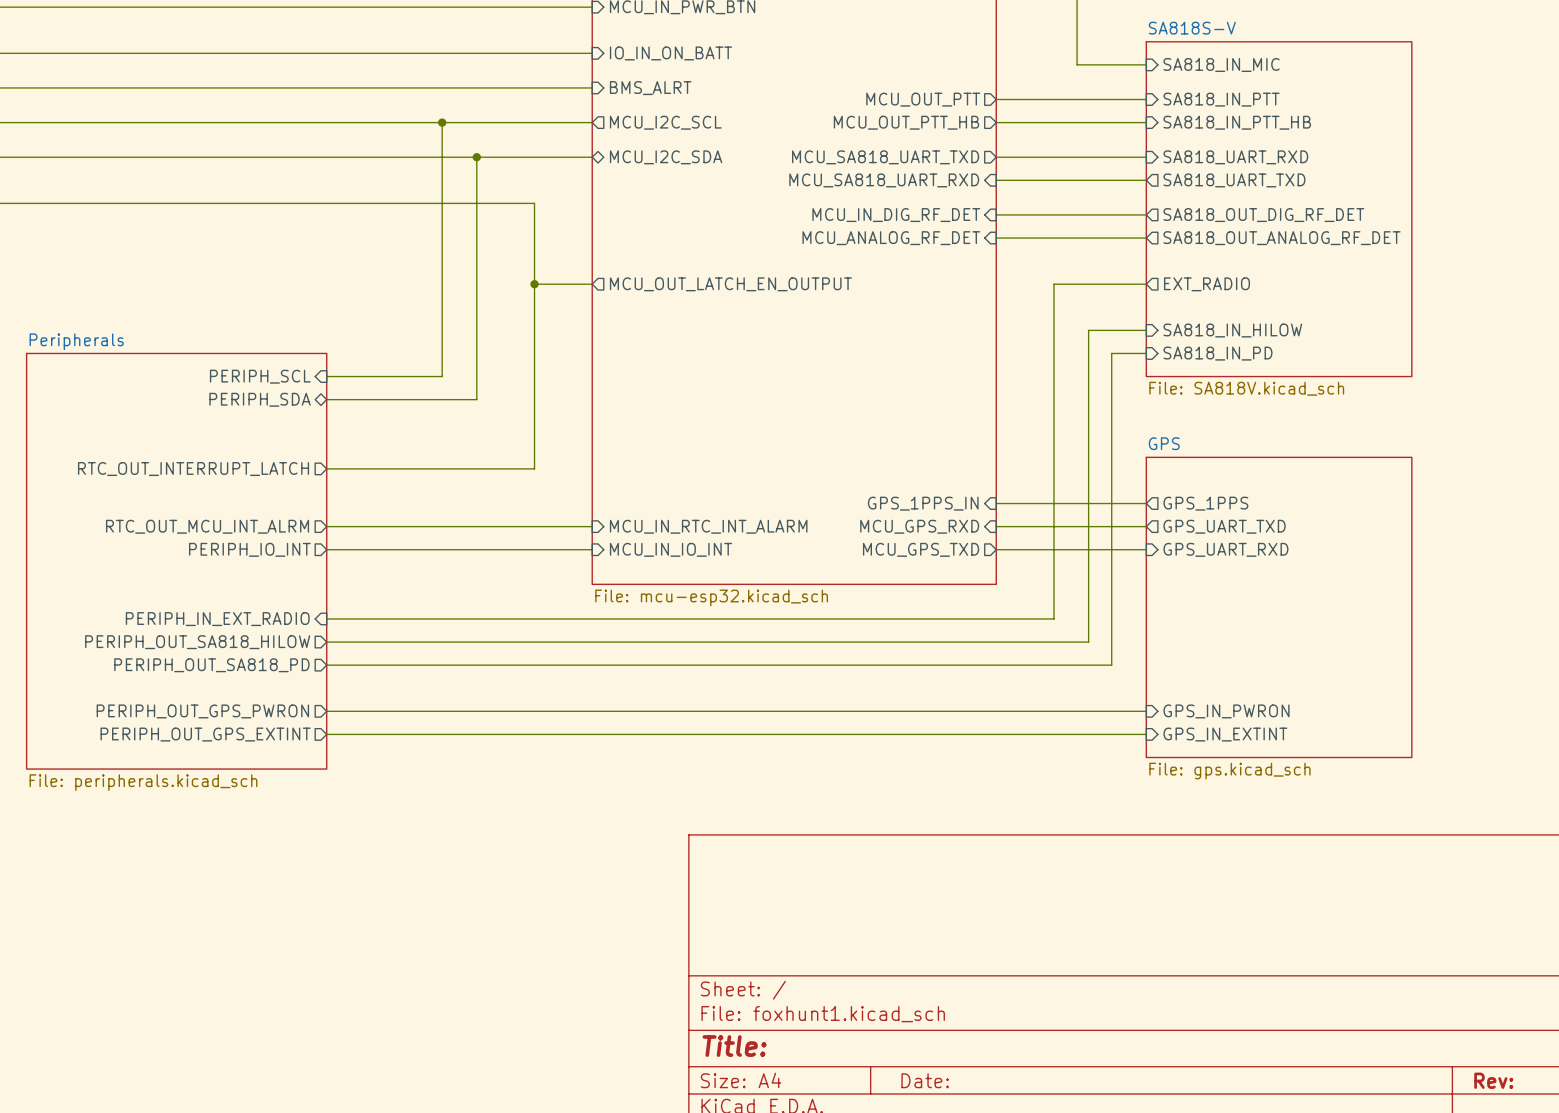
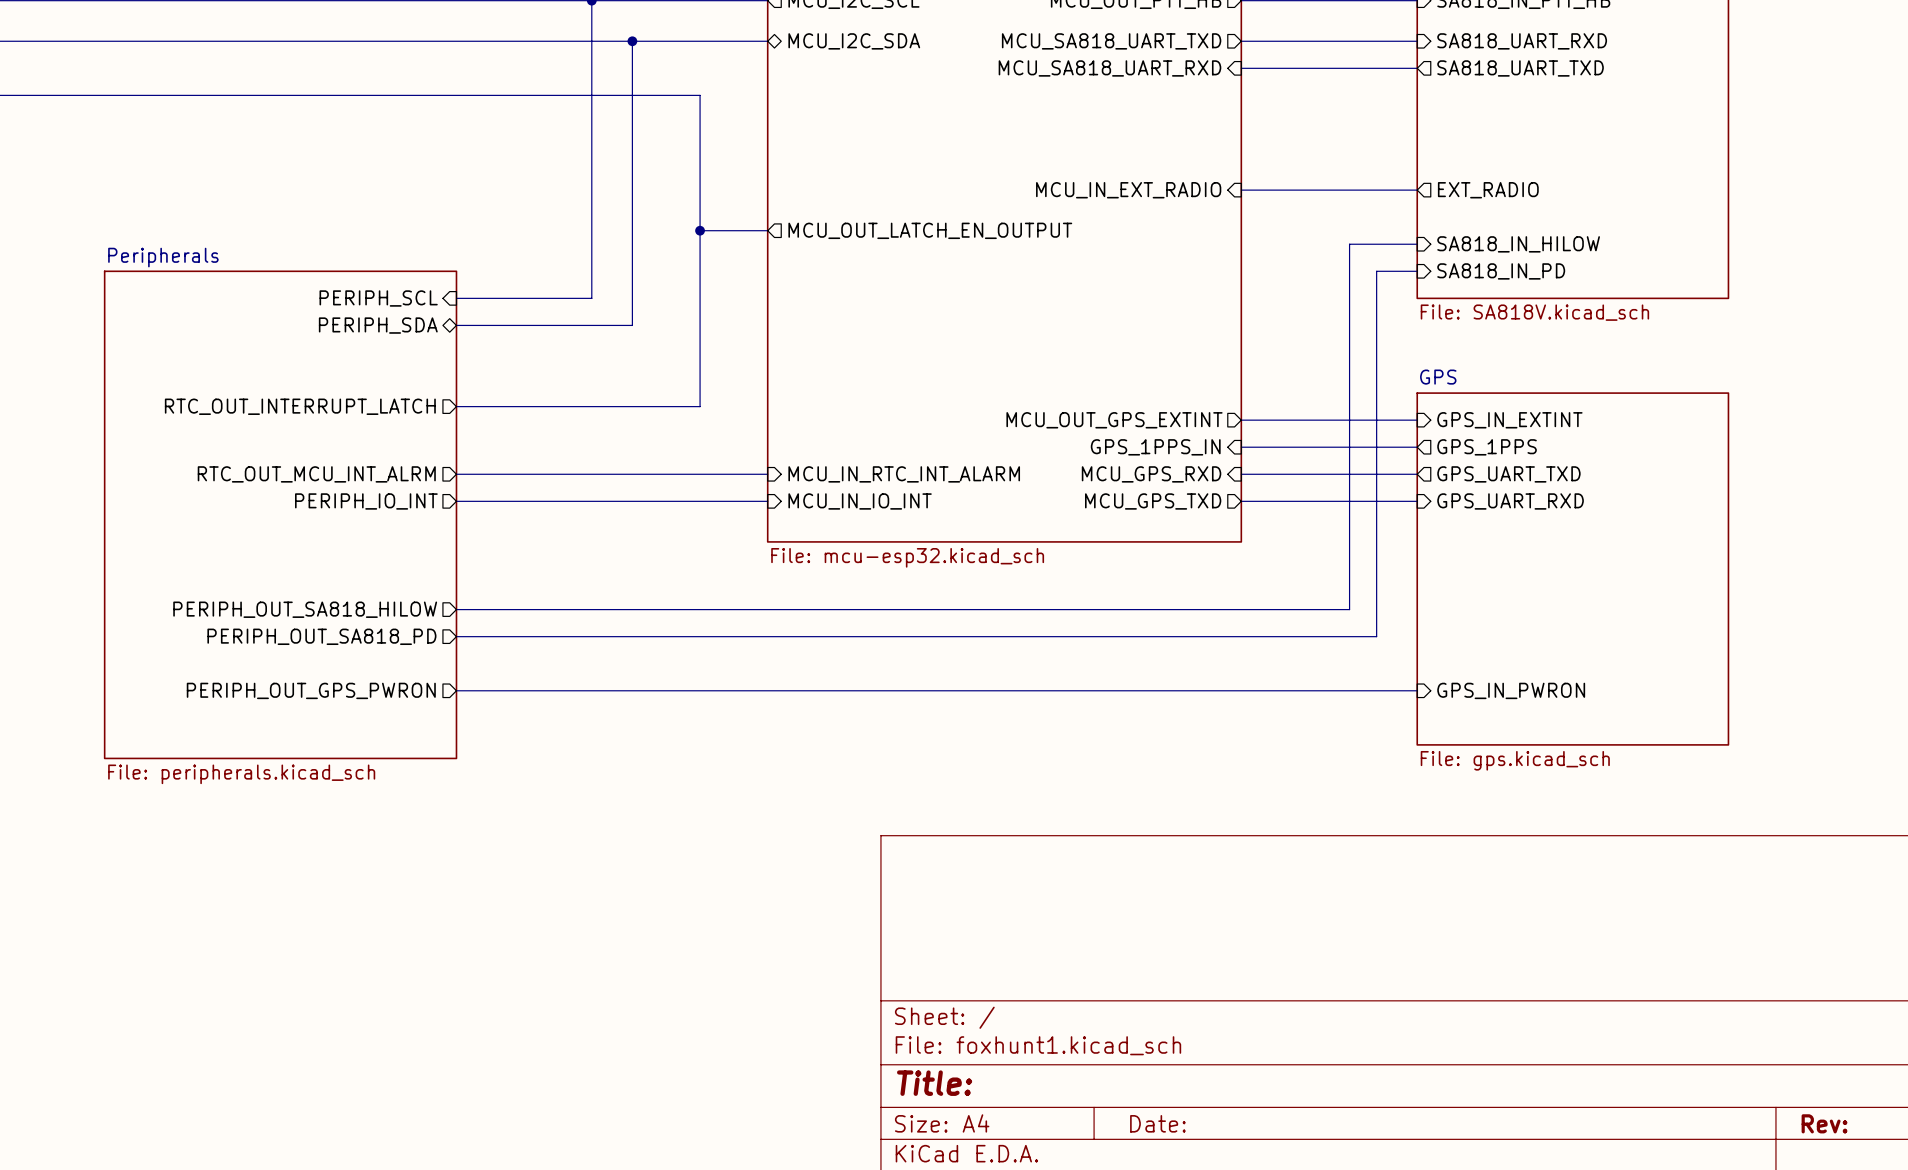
wire: (996, 214) (1146, 214) -> none
sheet pin: MCU_IN_DIG_RF_DET (896, 215) -> none
sheet pin: SA818_OUT_DIG_RF_DET (1263, 215) -> none
sheet pin: MCU_ANALOG_RF_DET (891, 238) -> none
wire: (996, 238) (1146, 238) -> none
sheet pin: SA818_OUT_ANALOG_RF_DET (1282, 238) -> none
wire: (534, 284) (592, 284) -> (700, 230) (767, 230)
junction position: (534, 284) -> (700, 230)
sheet pin position: MCU_OUT_LATCH_EN_OUTPUT (730, 284) -> MCU_OUT_LATCH_EN_OUTPUT (930, 230)
sheet pin: none -> MCU_IN_EXT_RADIO (1128, 190)
wire: (1053, 284) (1053, 618) (326, 618) -> (1308, 190) (1241, 190)
sheet pin: none -> MCU_OUT_GPS_EXTINT (1114, 420)
wire: none -> (1241, 420) (1417, 420)
sheet pin: none -> GPS_IN_EXTINT (1509, 420)
sheet pin: PERIPH_IN_EXT_RADIO (217, 619) -> none
sheet pin: PERIPH_OUT_GPS_EXTINT (205, 734) -> none
wire: (326, 734) (1146, 734) -> none
sheet pin: GPS_IN_EXTINT (1225, 734) -> none

